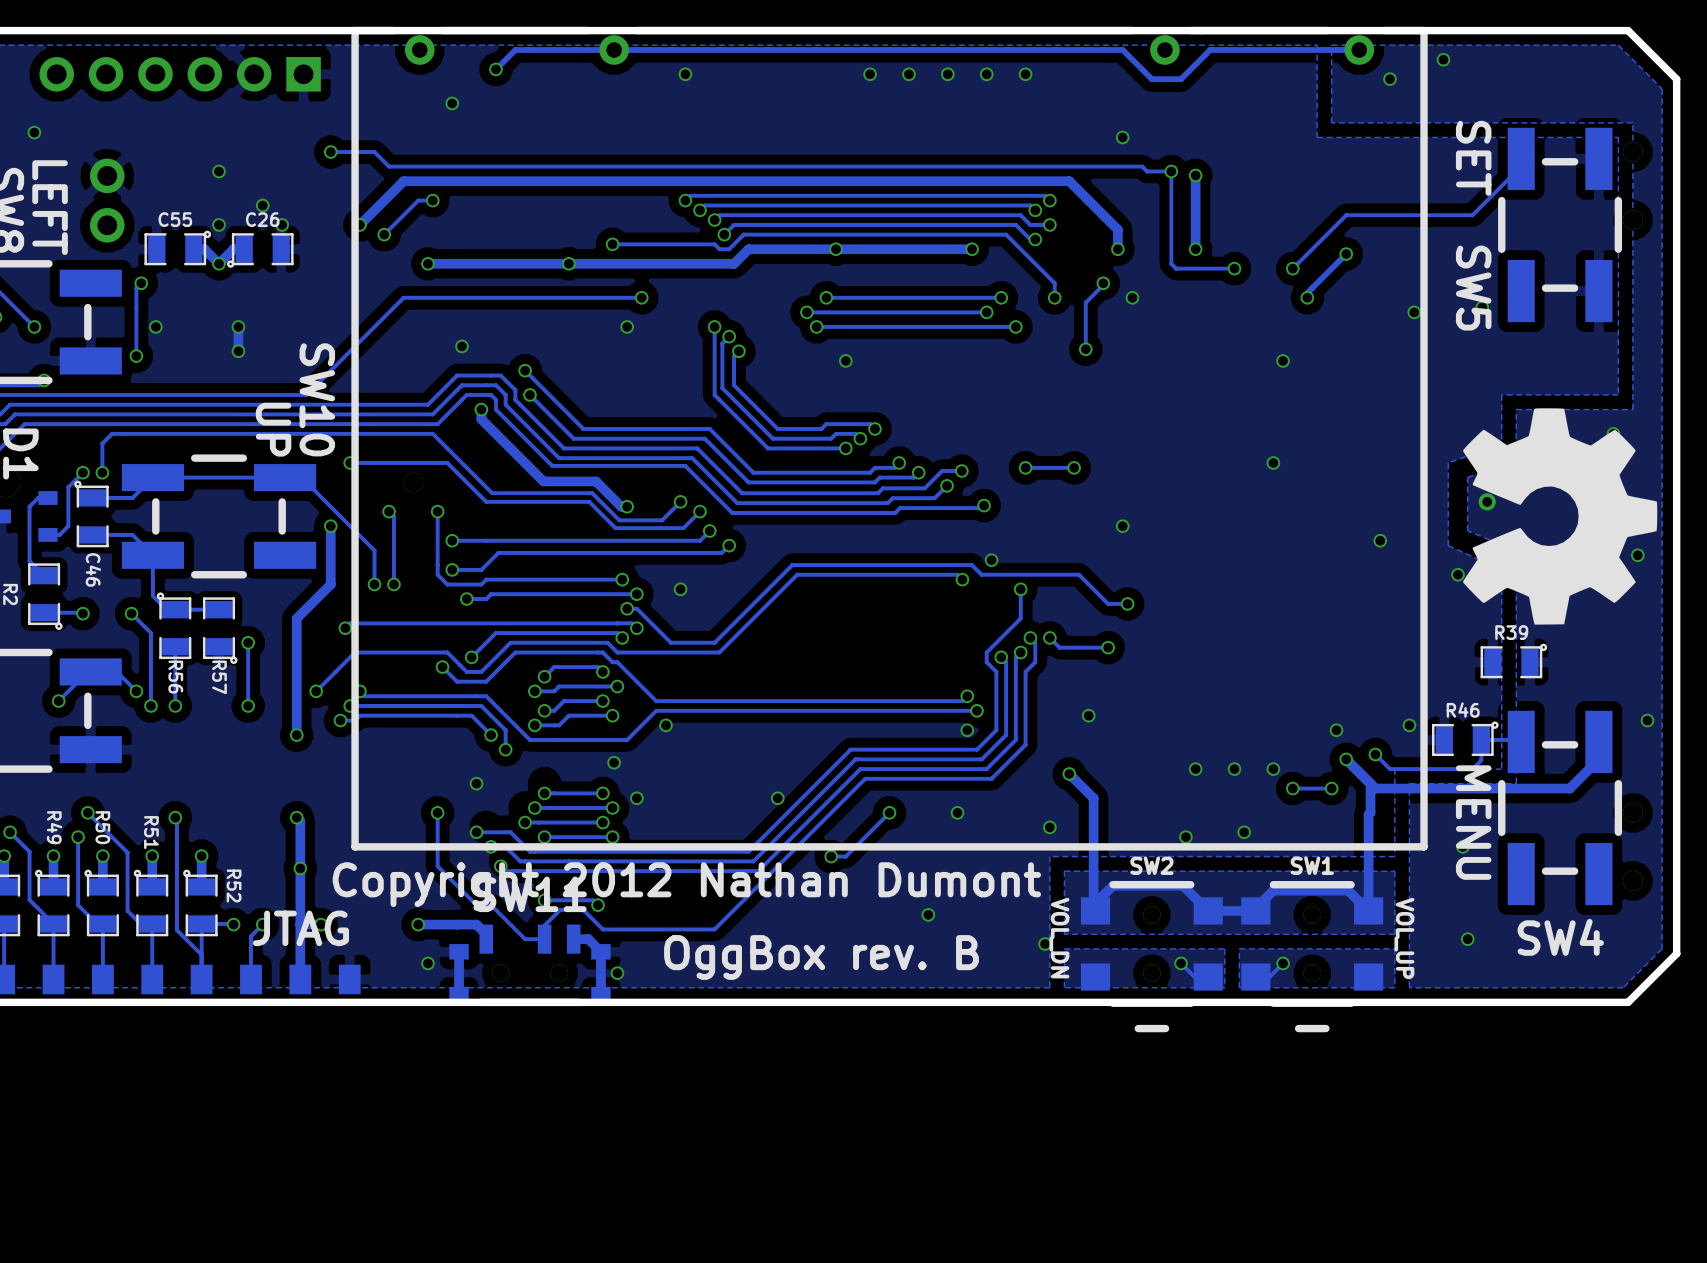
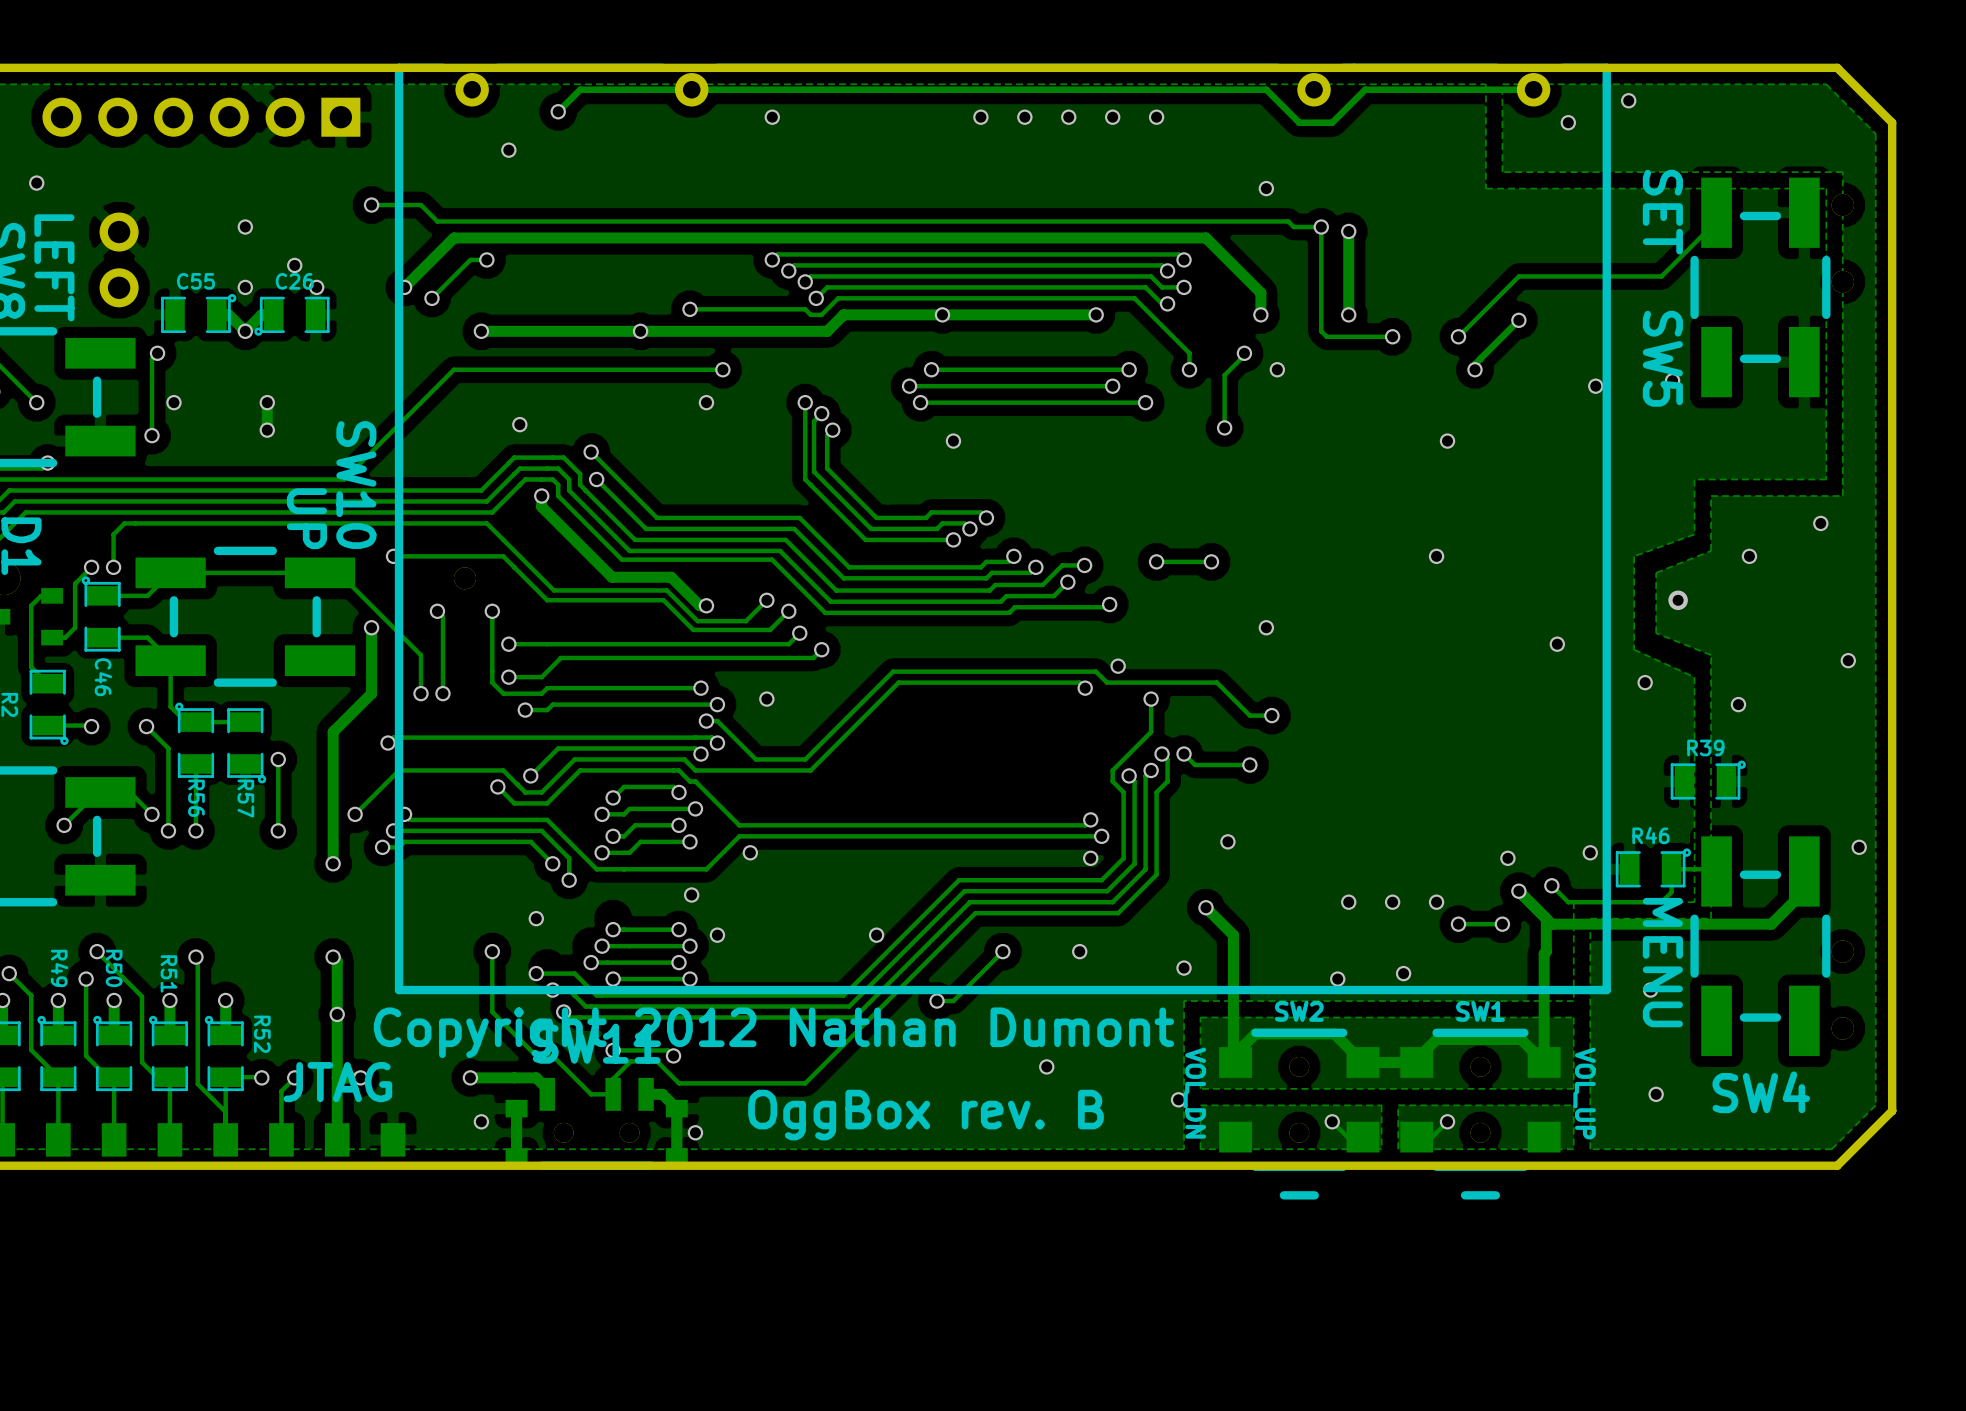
drawing: [1462, 408, 1658, 625] -> none

